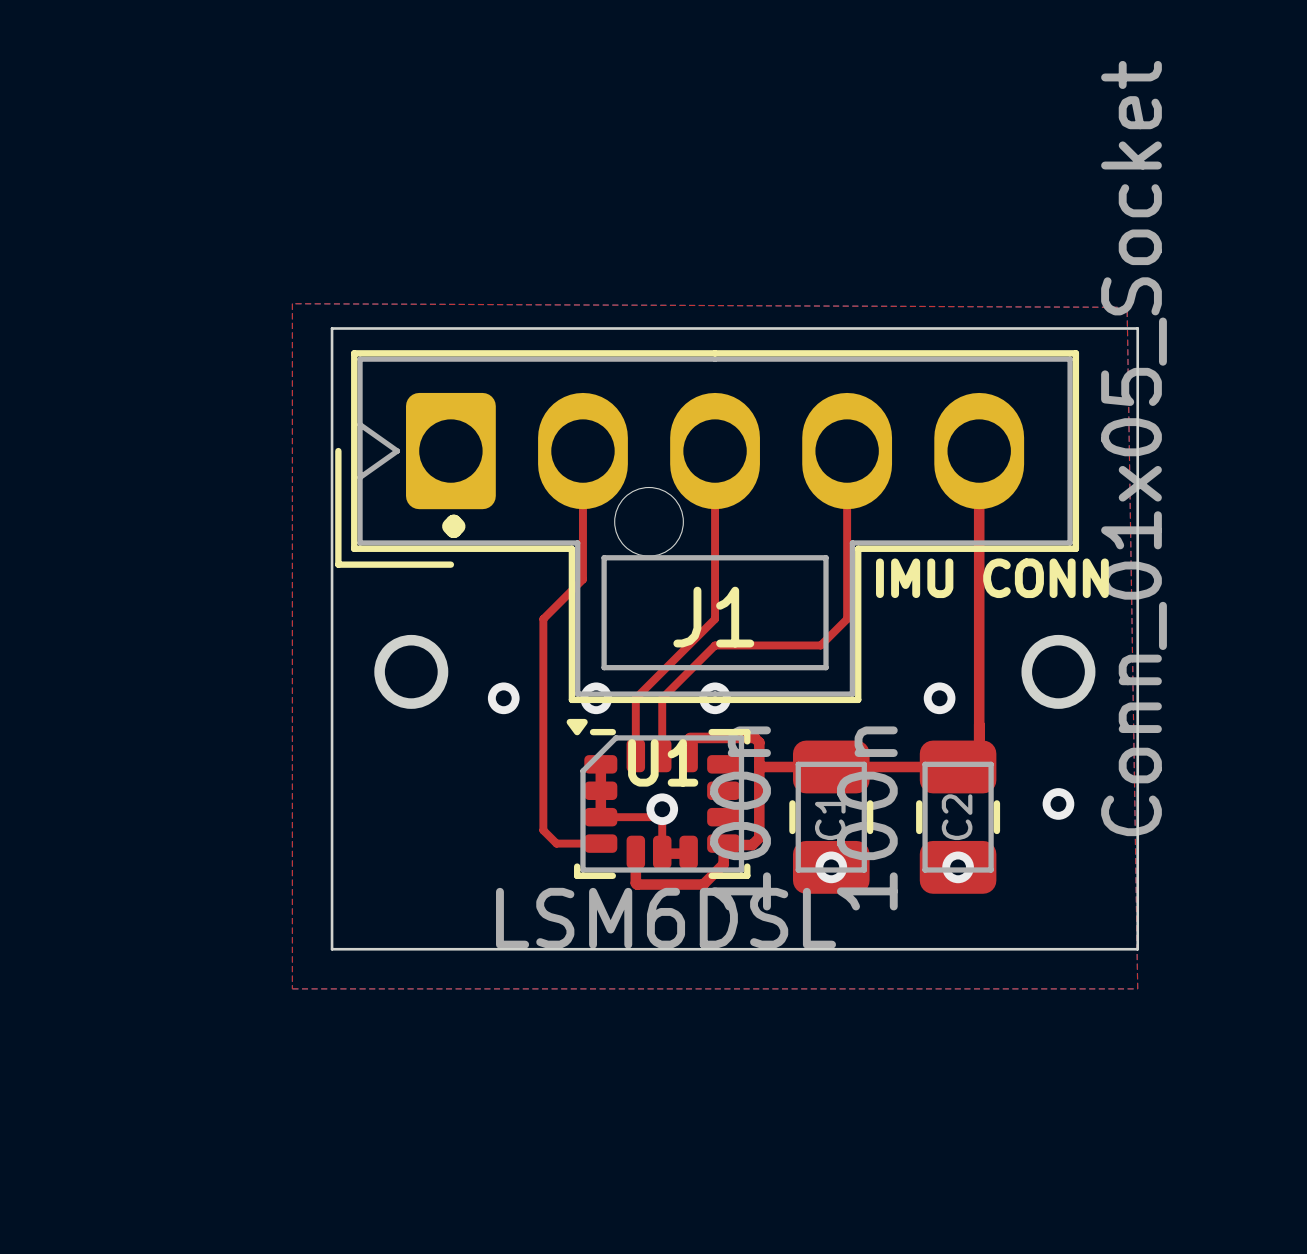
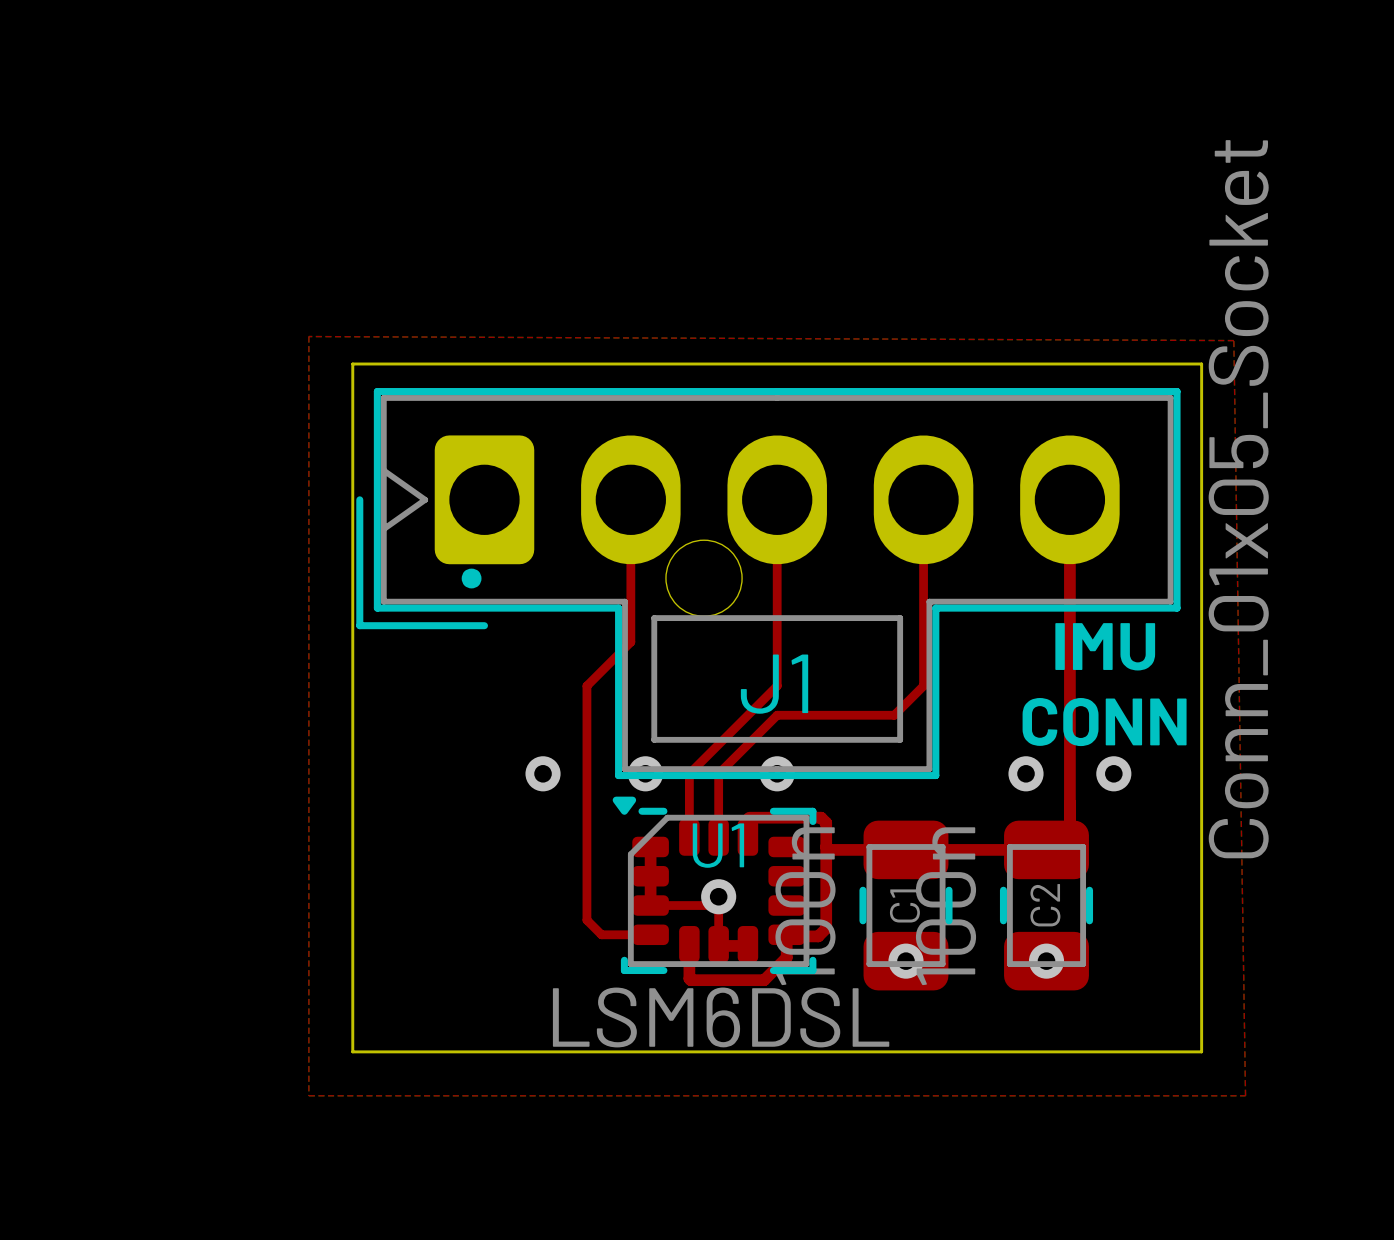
board edge: (1098, 328) (1137, 328) (1137, 949) (1098, 949) -> (1201, 364) (1201, 1051)
text: IMU CONN (992, 578) -> IMU (1105, 646)
round board edge: [374, 634, 449, 709] -> none
round board edge: [1021, 634, 1096, 709] -> none
text: none -> CONN (1104, 722)
via position: (1058, 803) -> (1113, 773)

